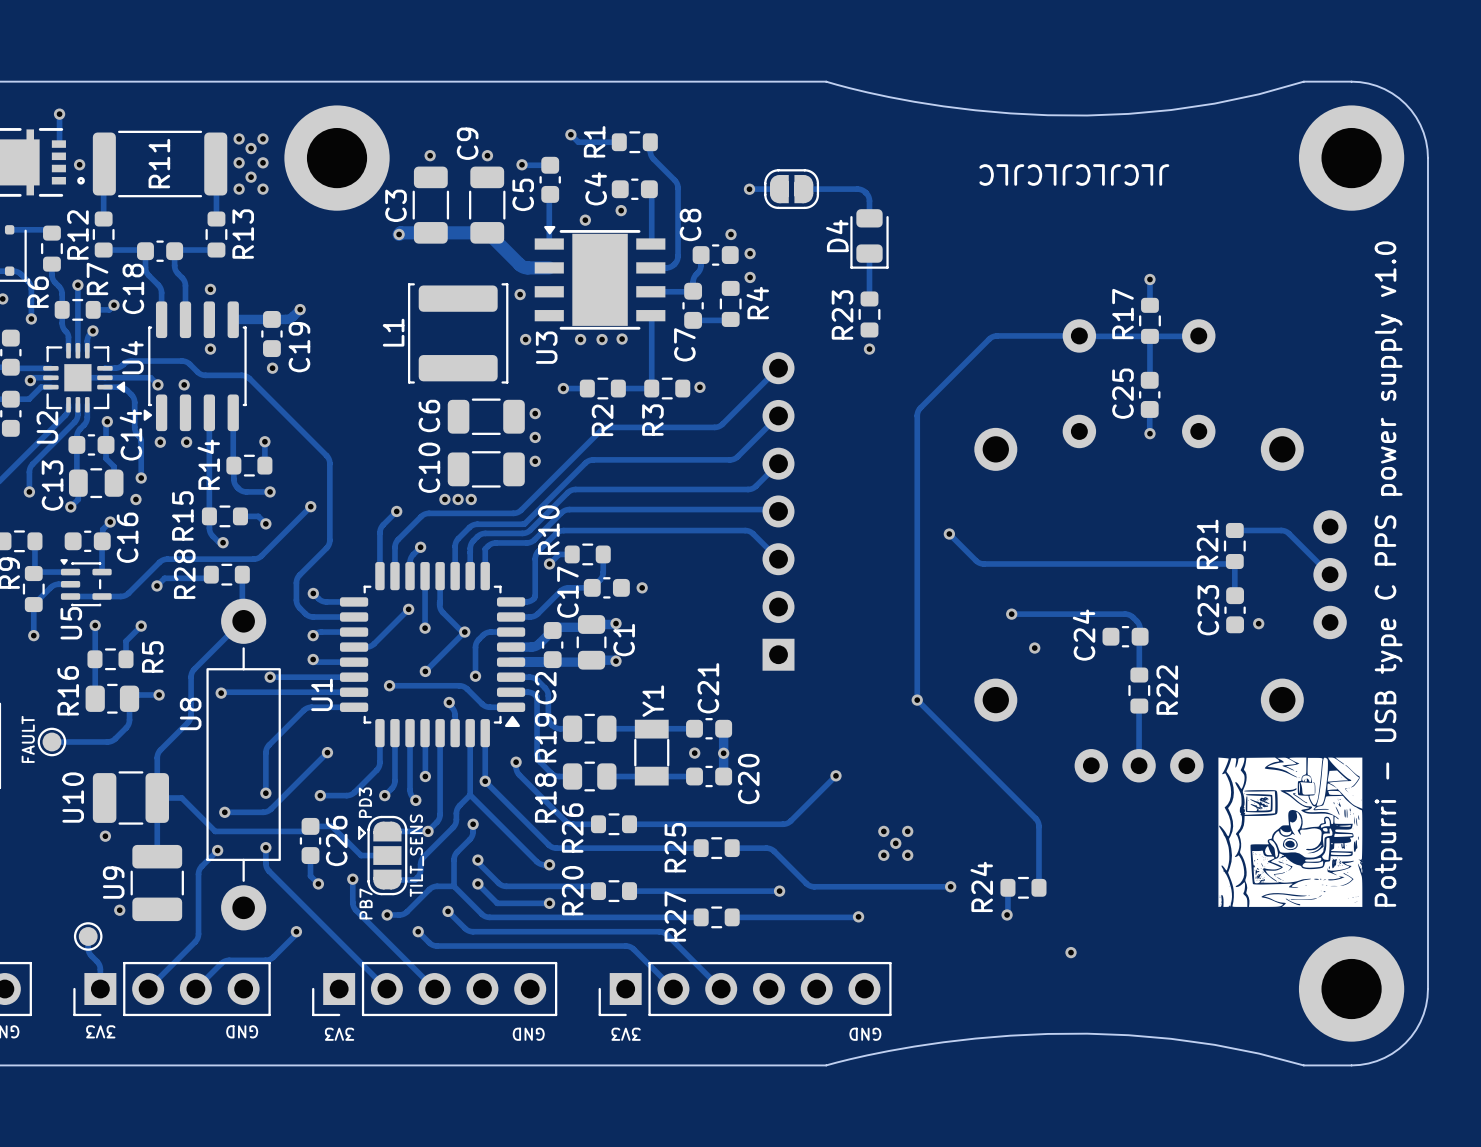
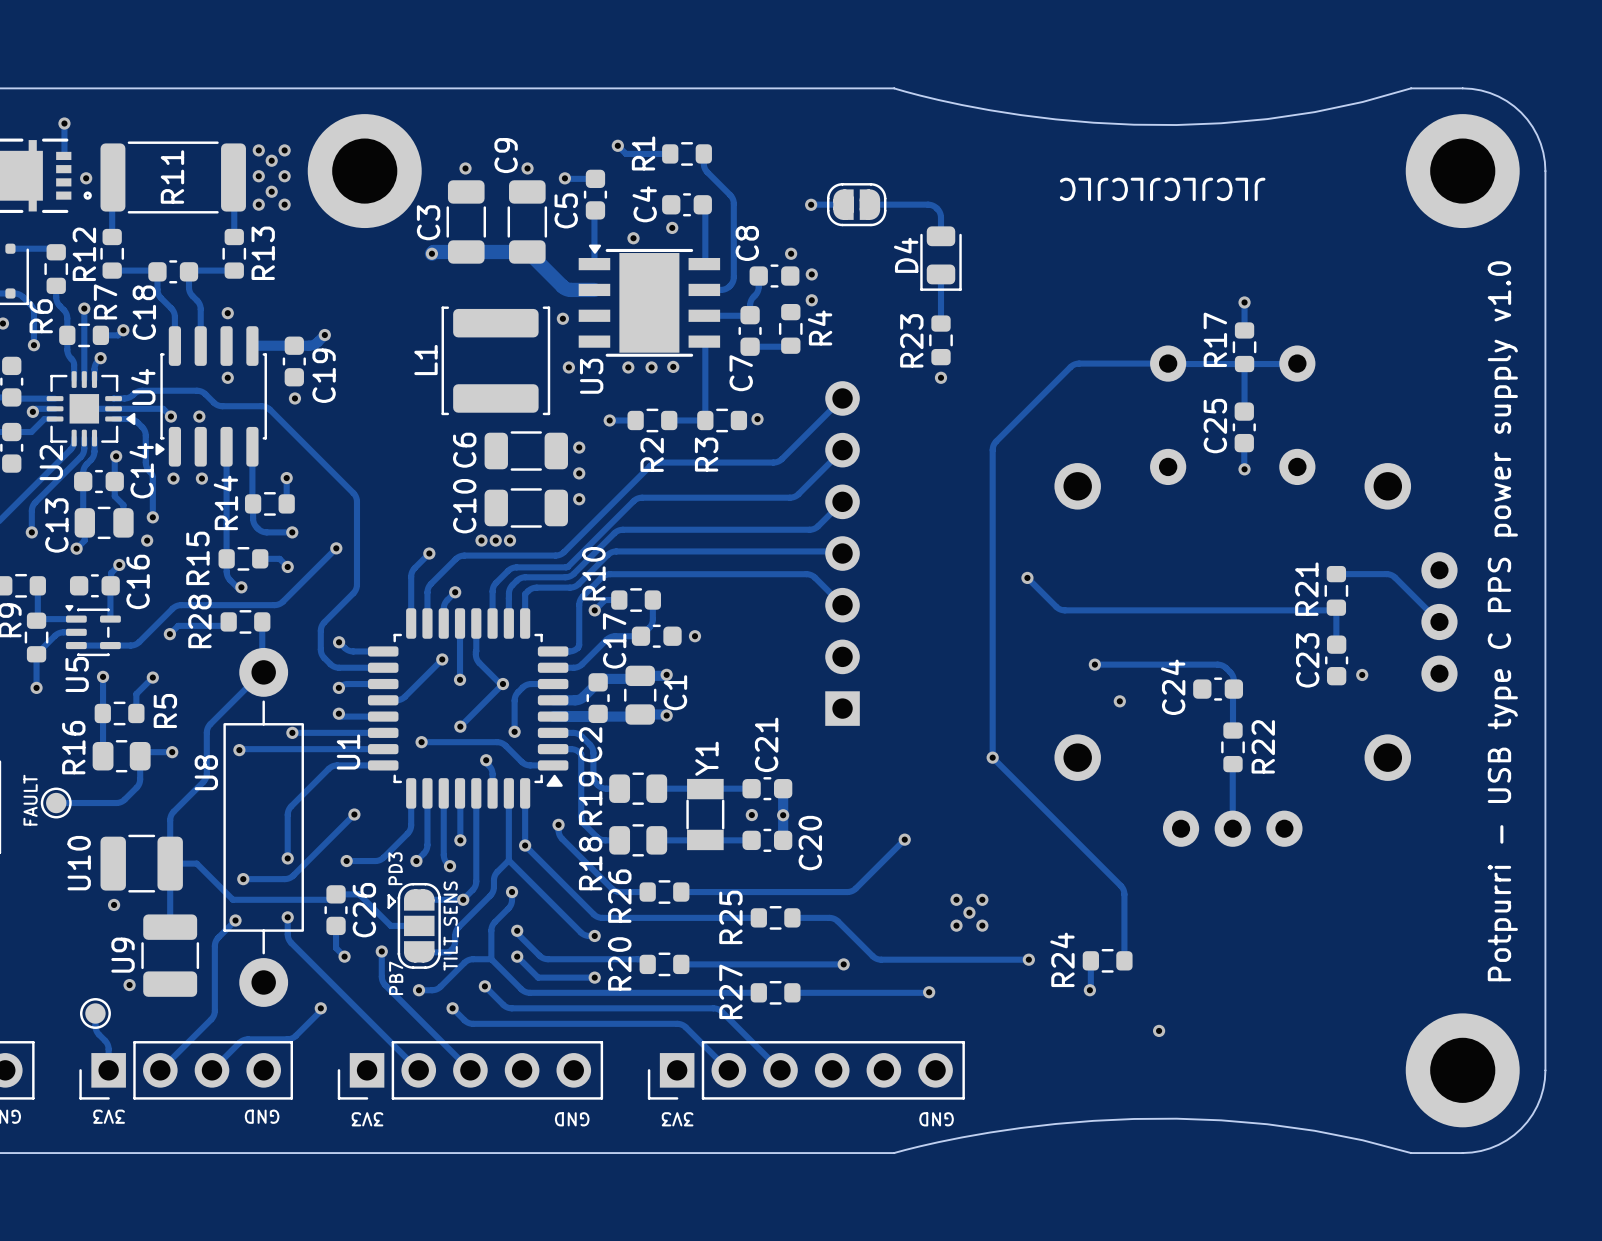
drawing: [1218, 757, 1363, 907] -> none

